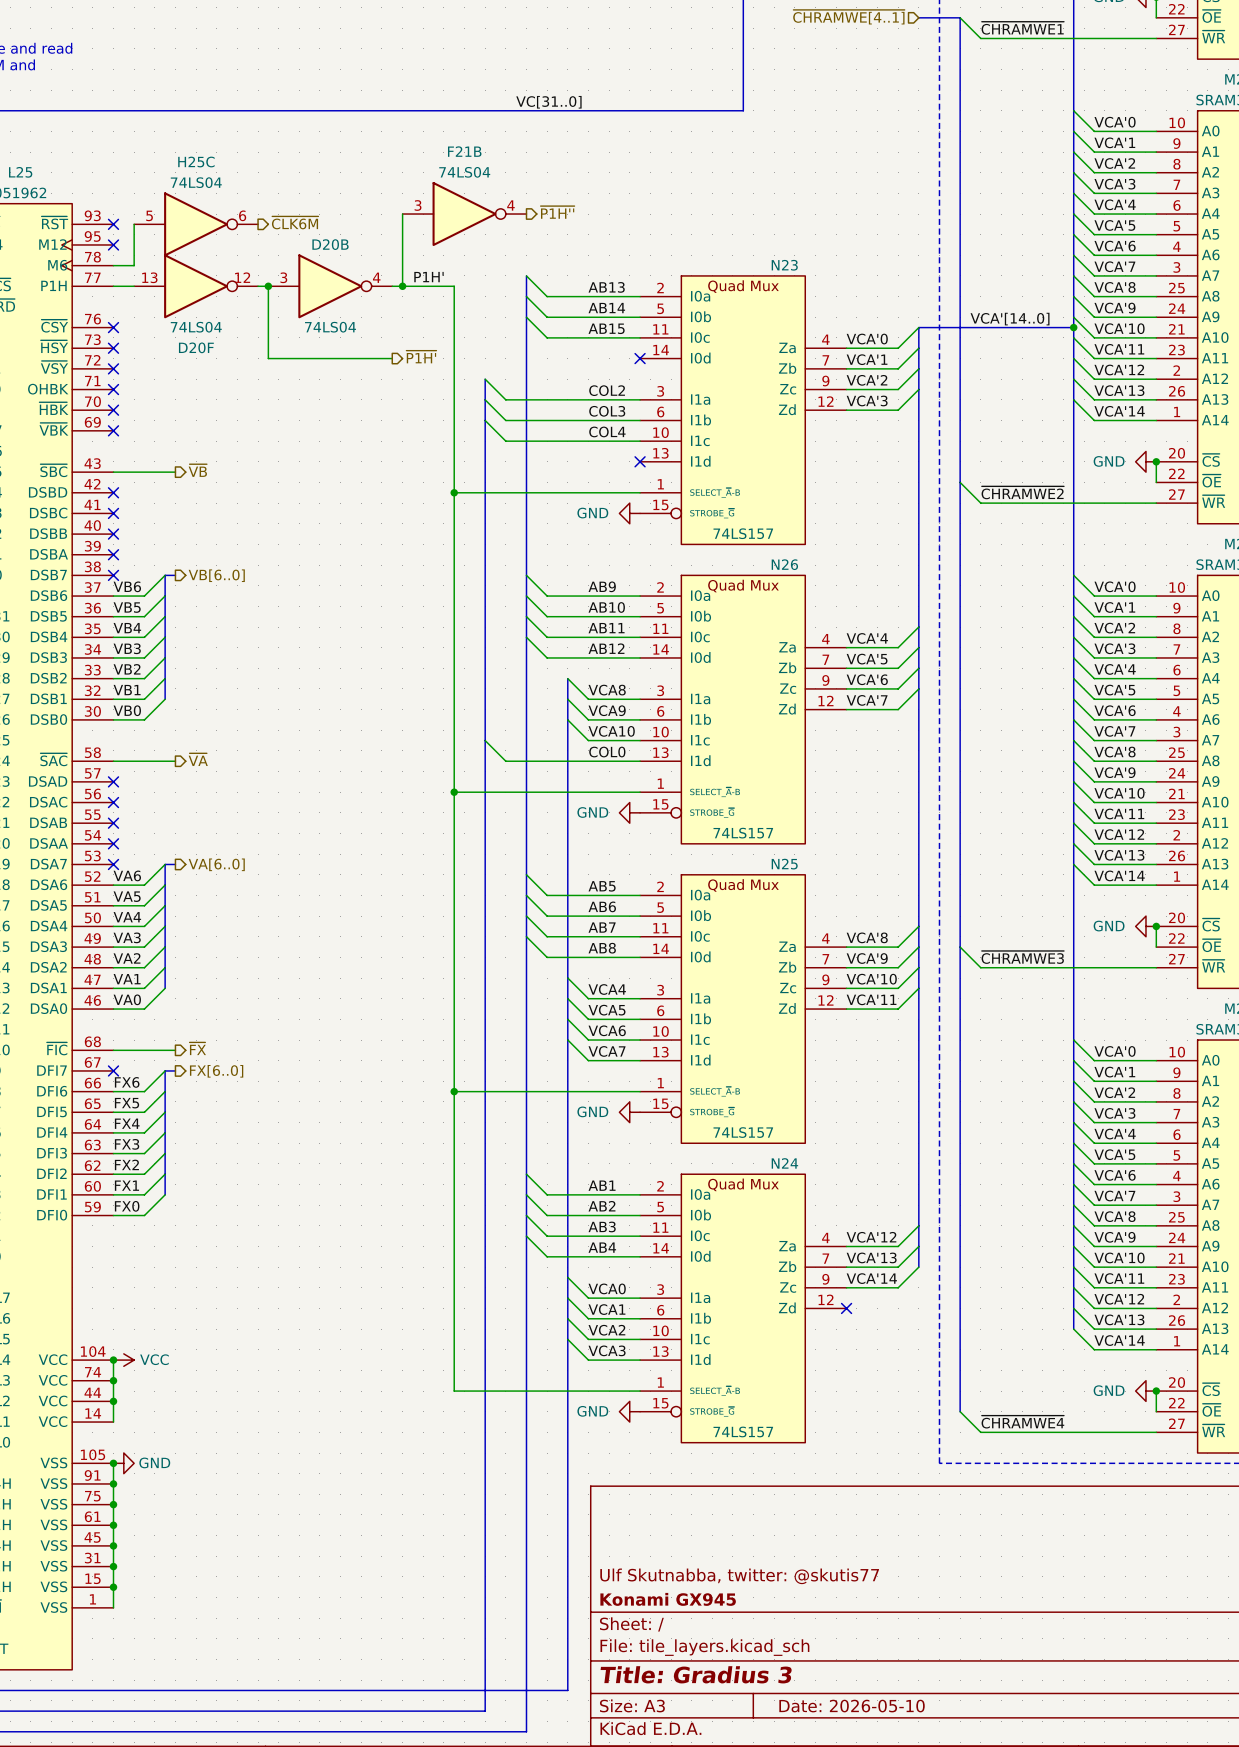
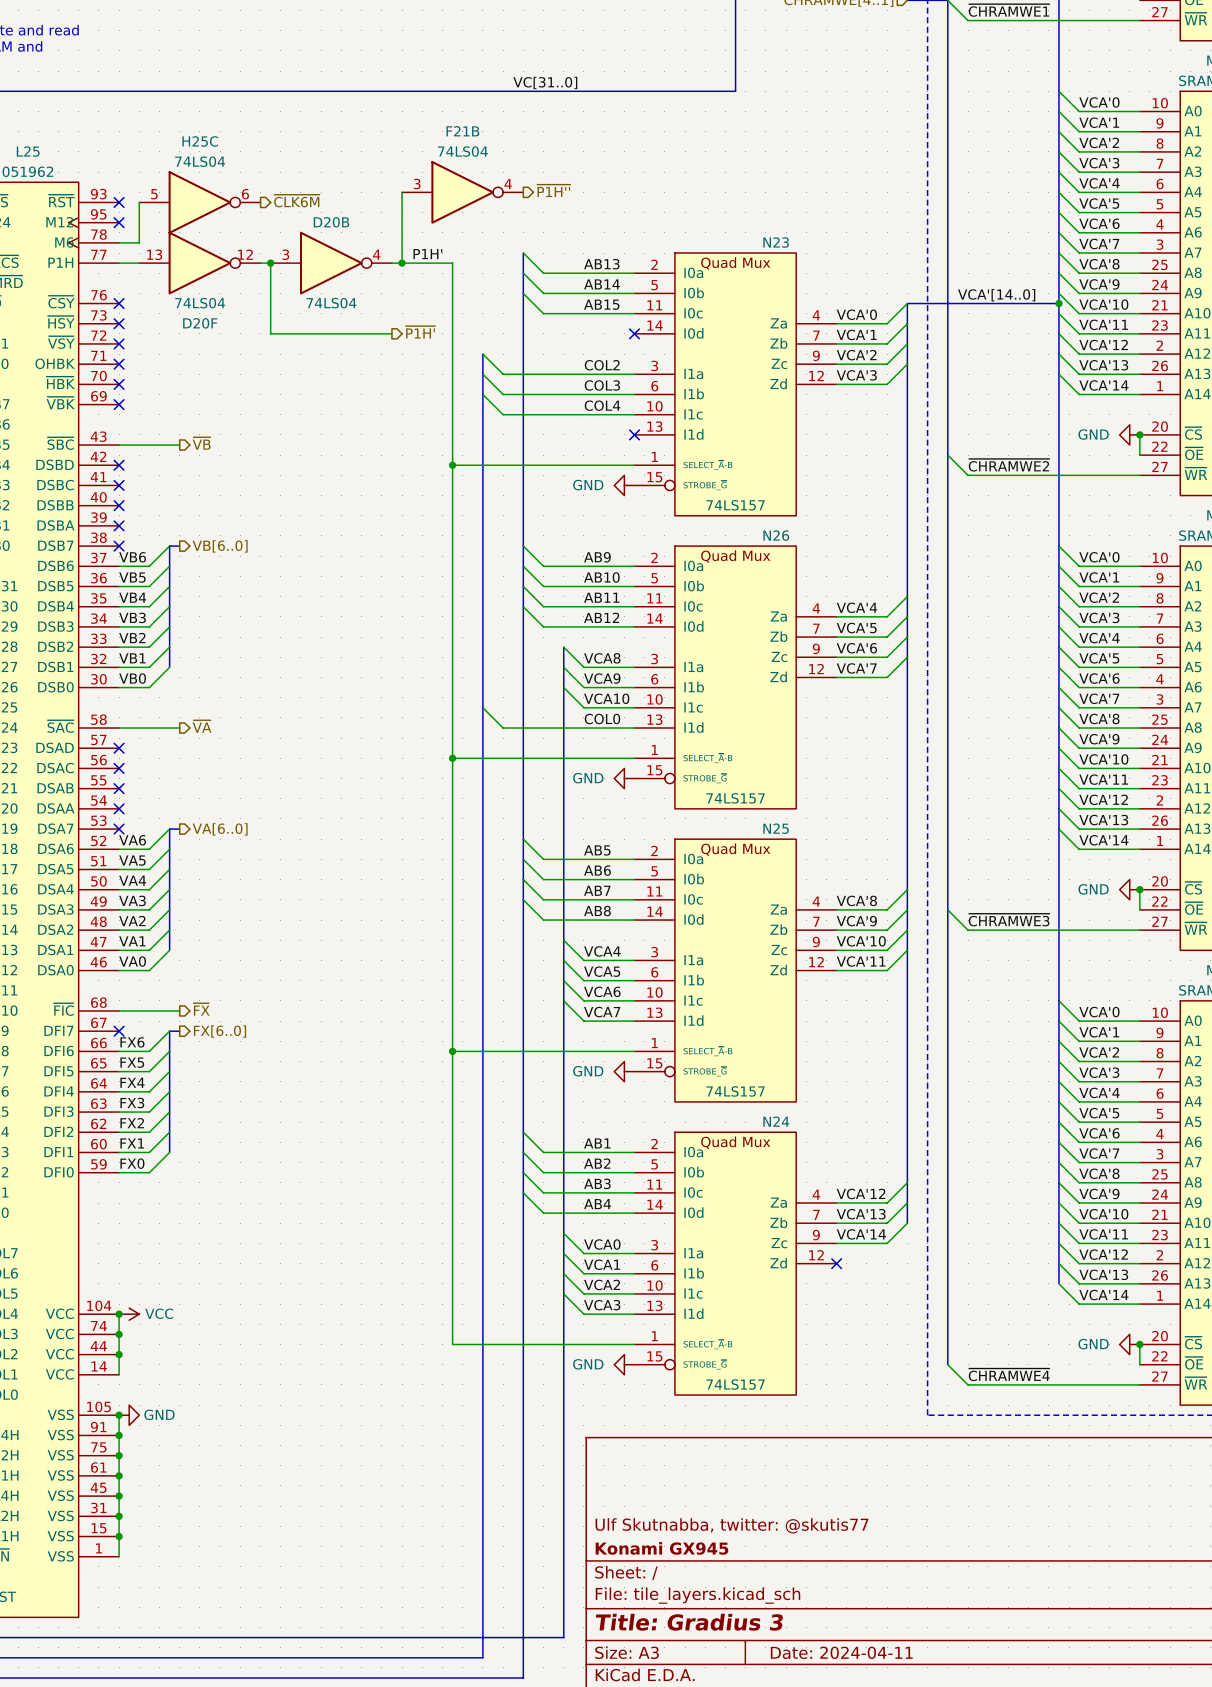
title block: Date: 2026-05-10 (852, 1706) -> Date: 2024-04-11 (841, 1652)

